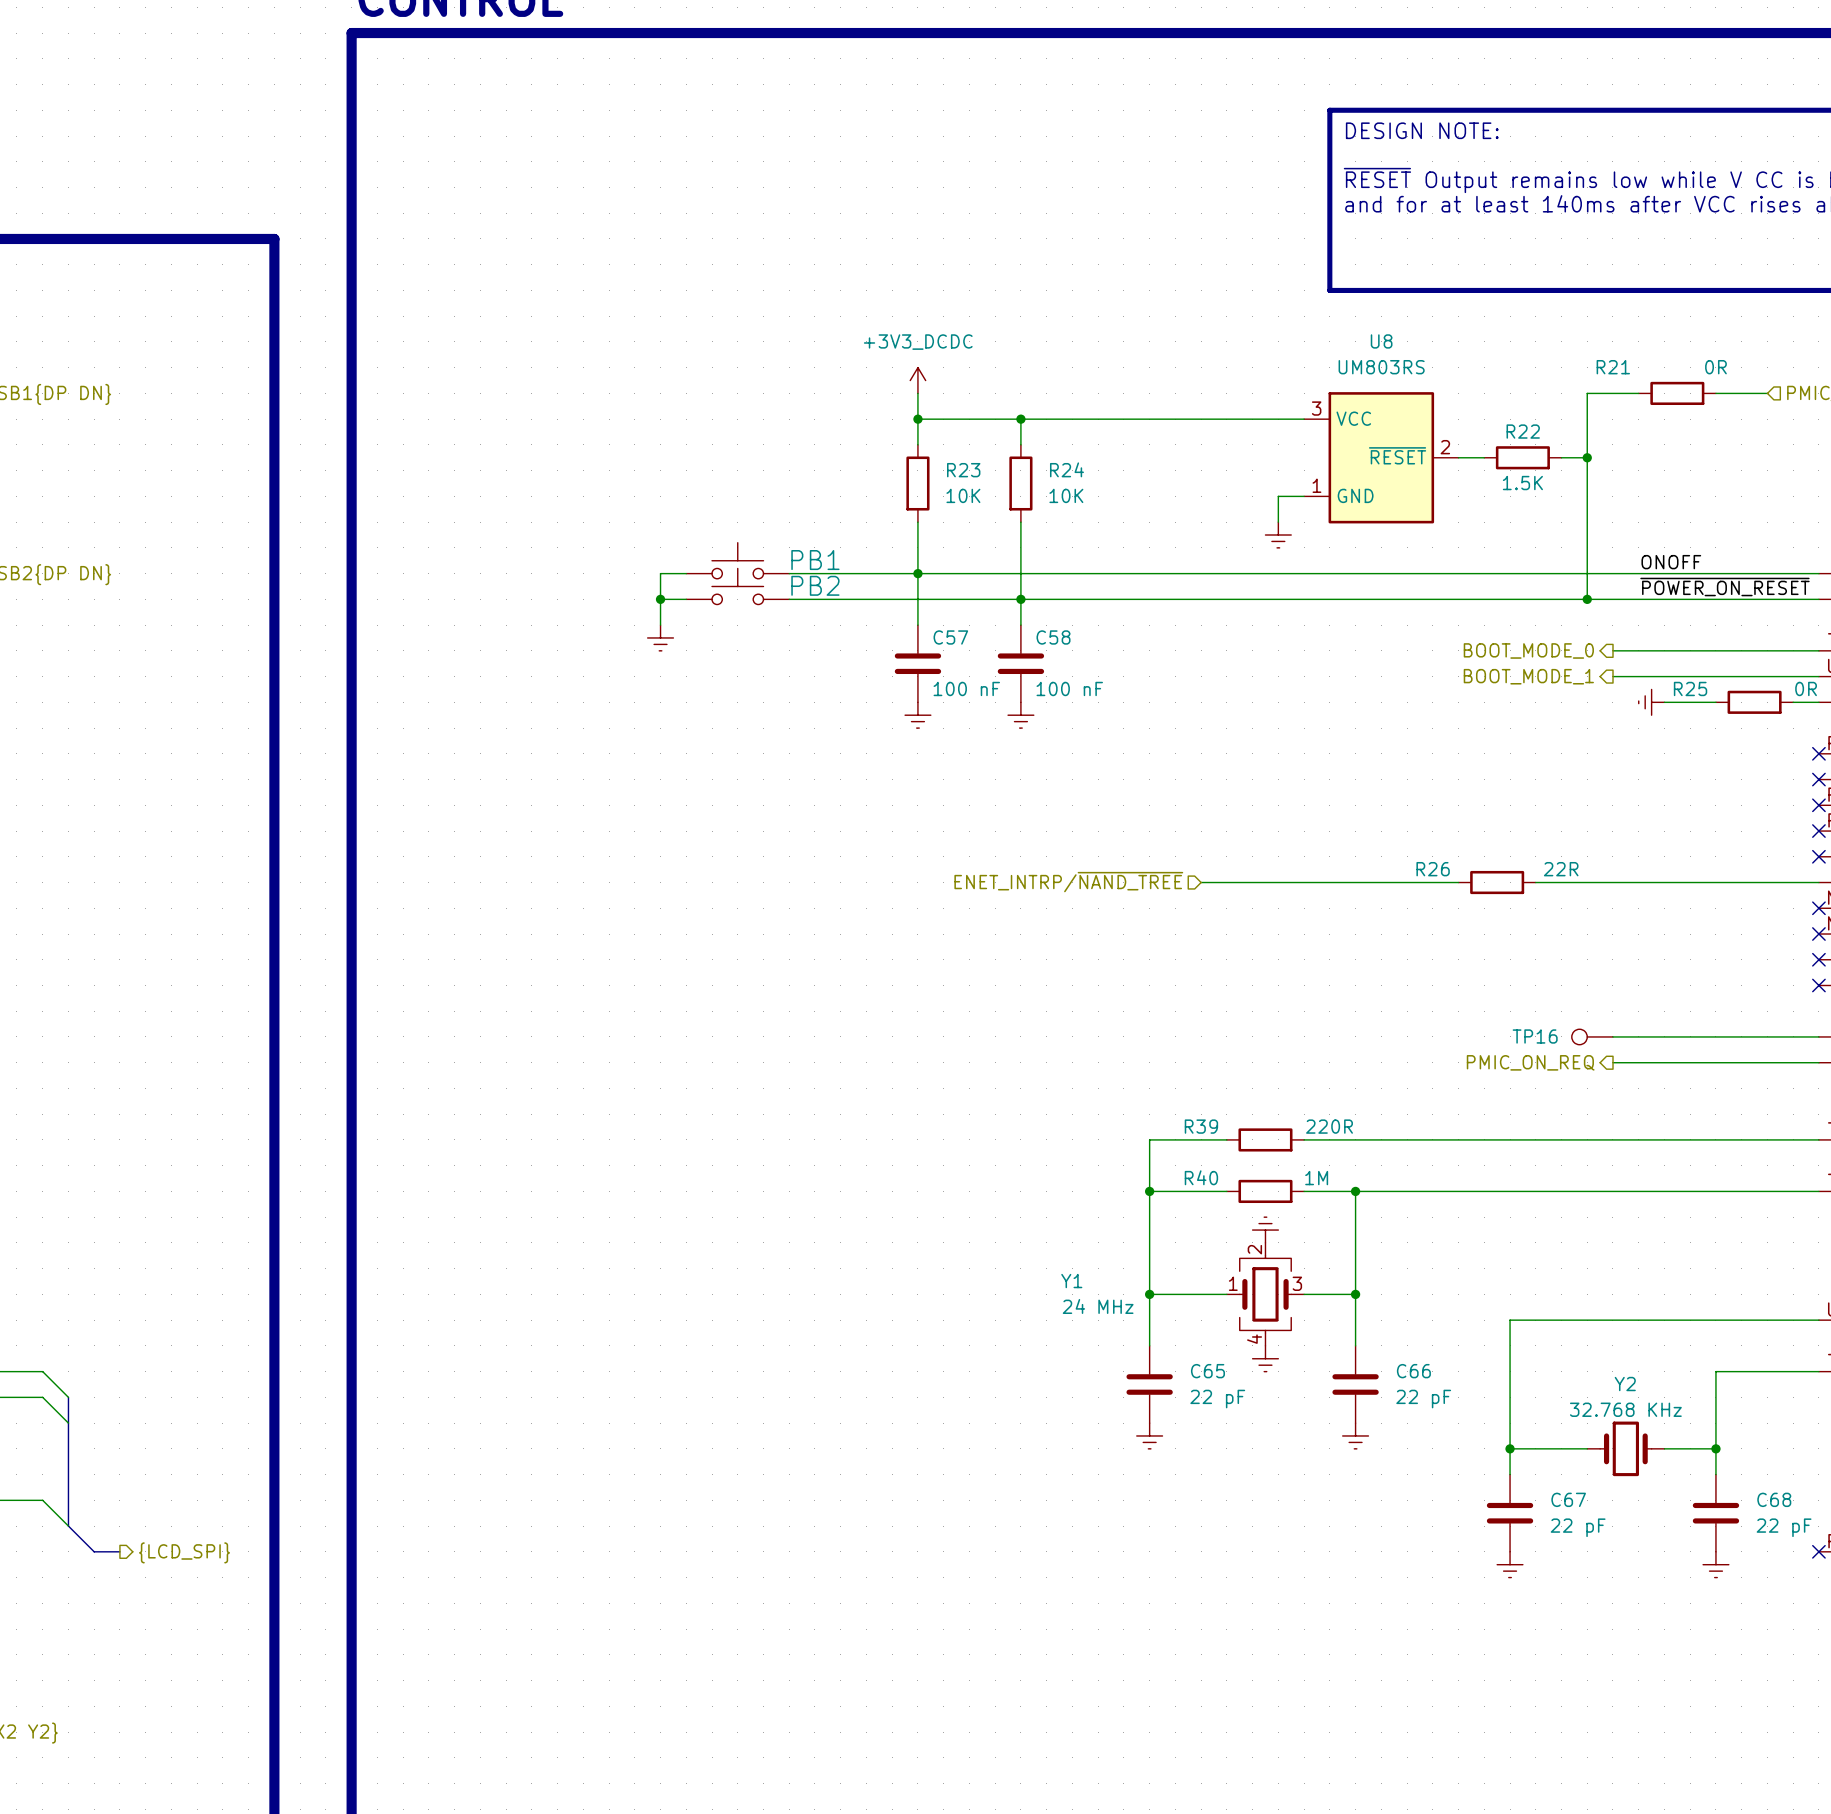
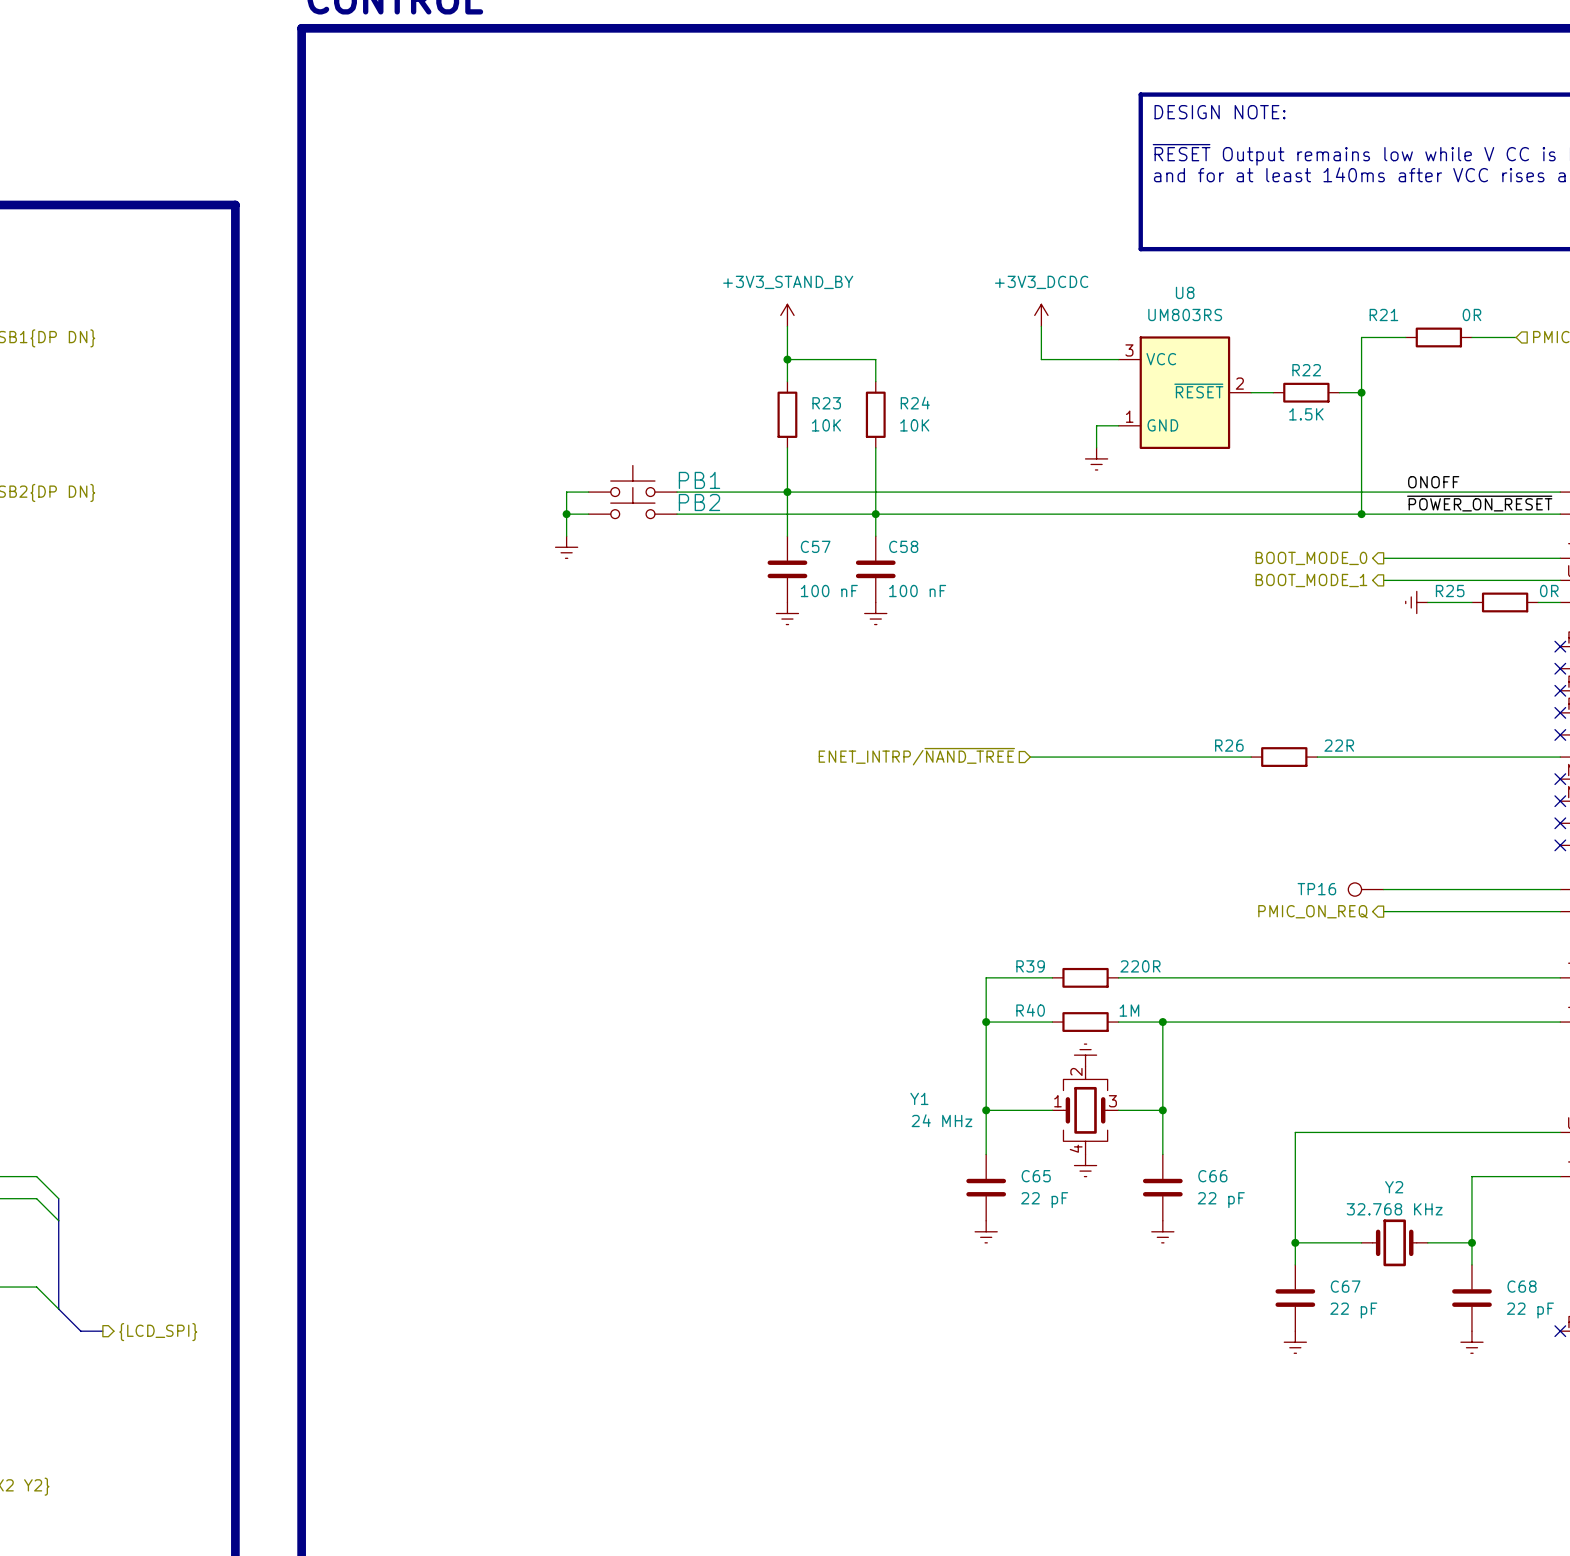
power symbol: none -> +3V3_STAND_BY (787, 315)
power symbol: none -> +3V3_DCDC (1041, 315)
power symbol: +3V3_DCDC (917, 380) -> none
wire: (1020, 419) (1213, 419) -> (1041, 326) (1041, 359)
junction: (1020, 419) -> none

